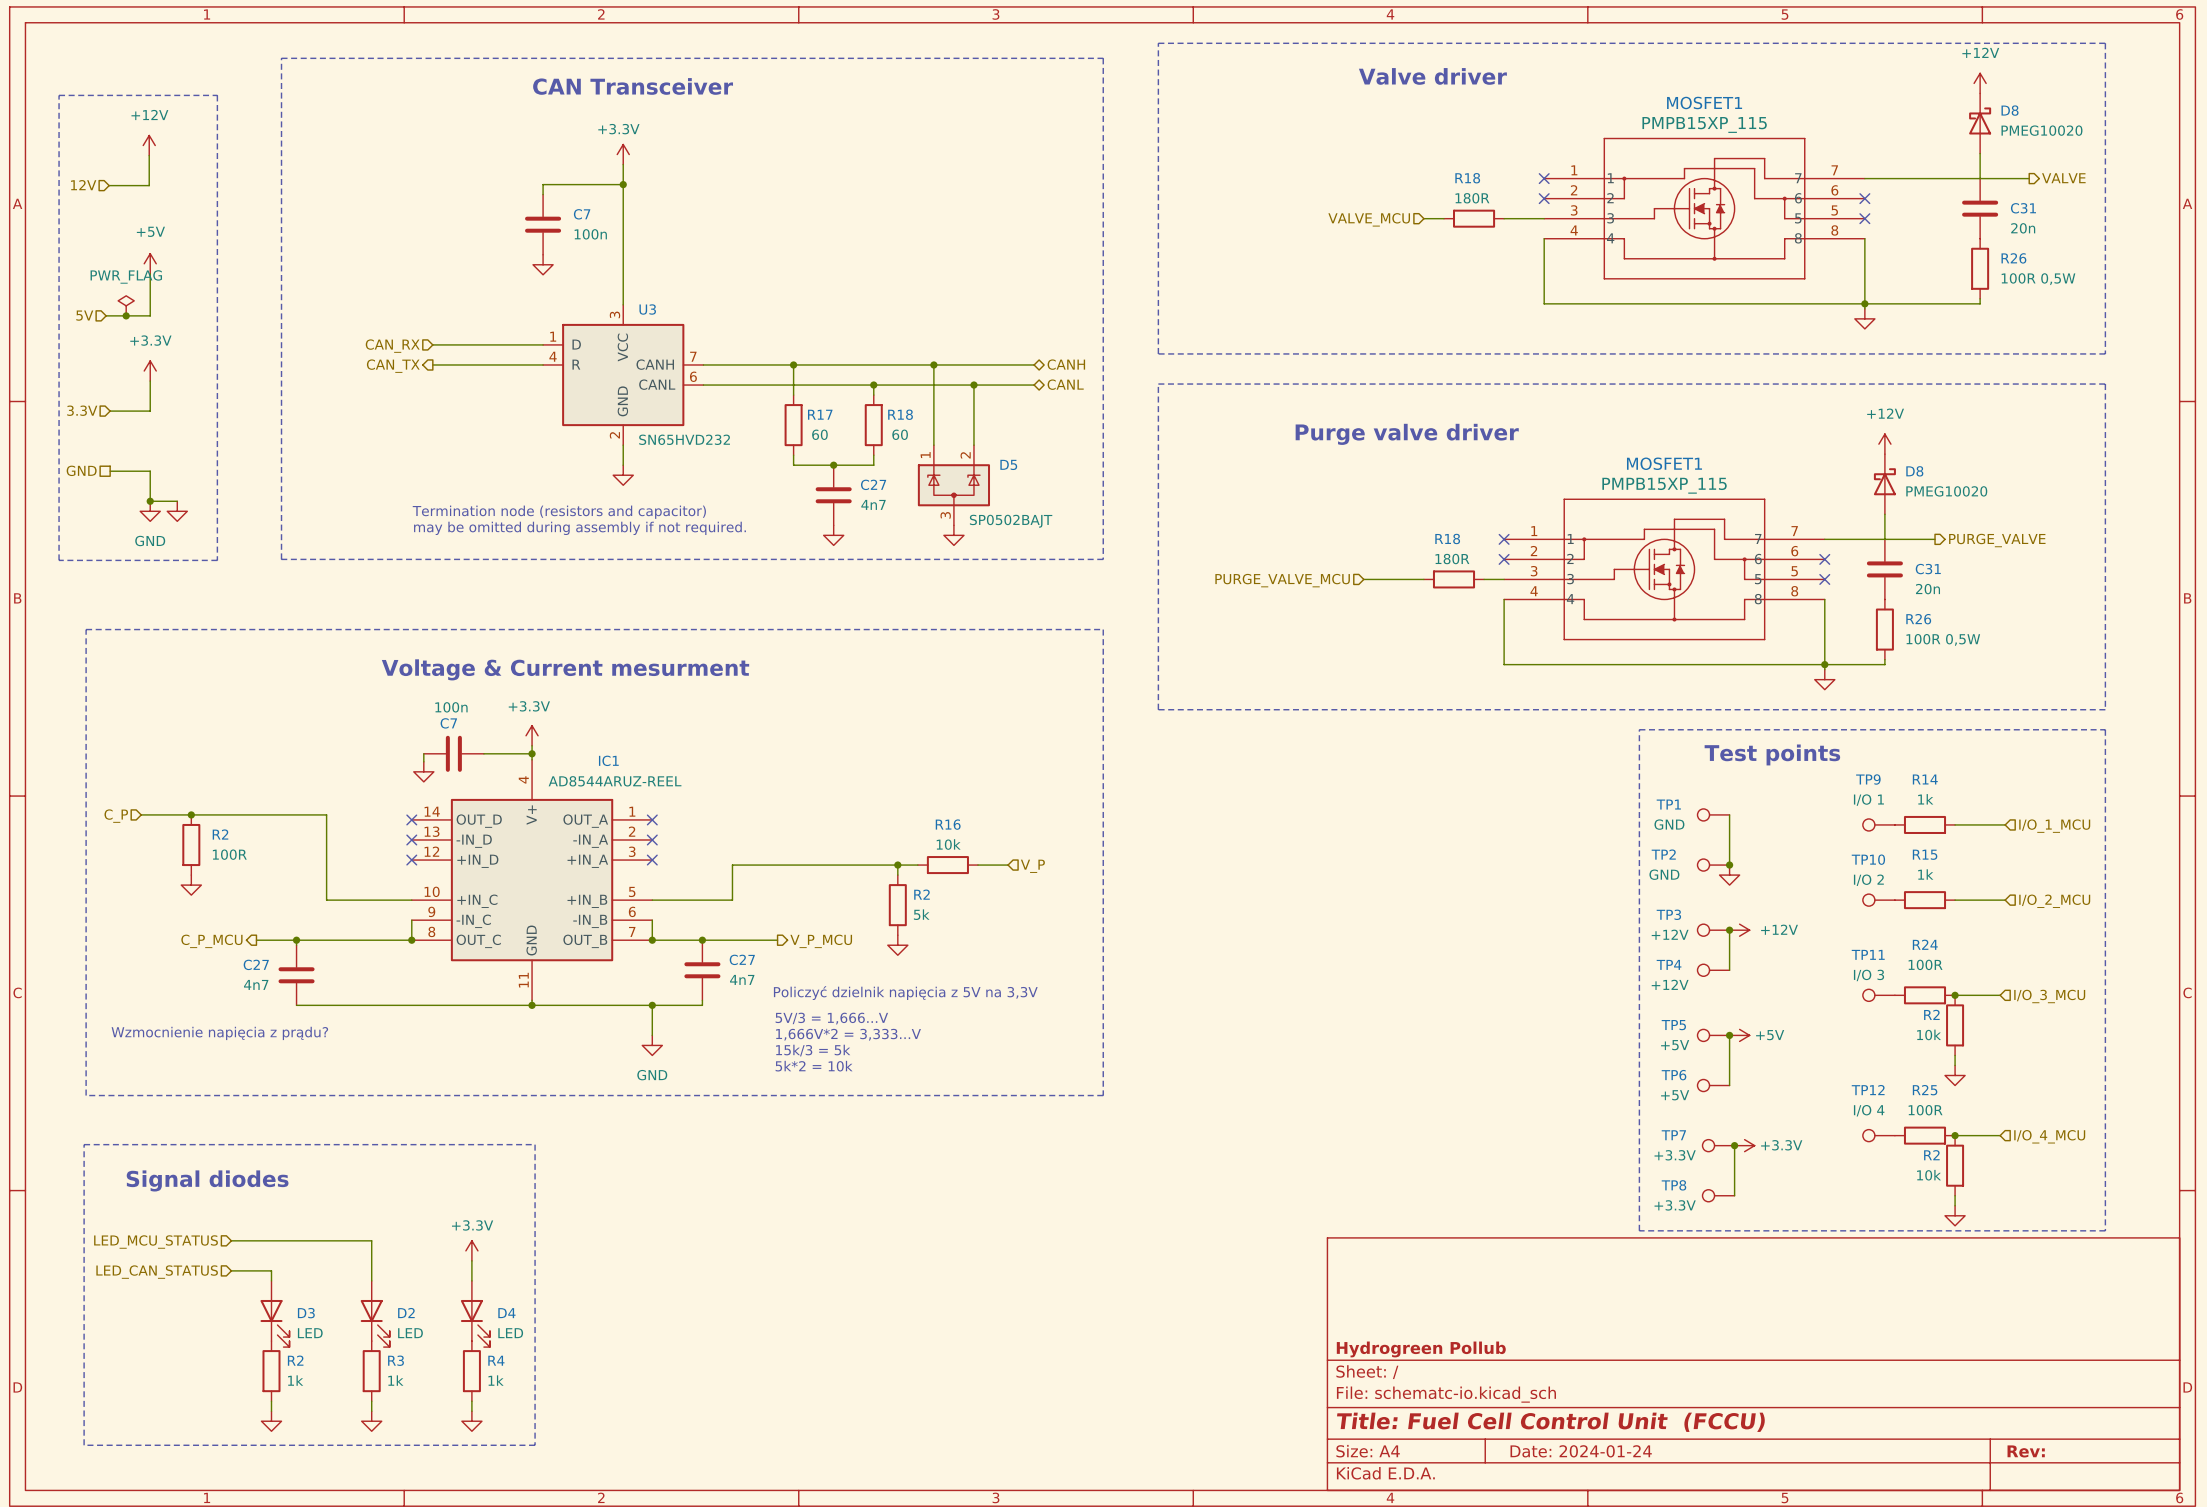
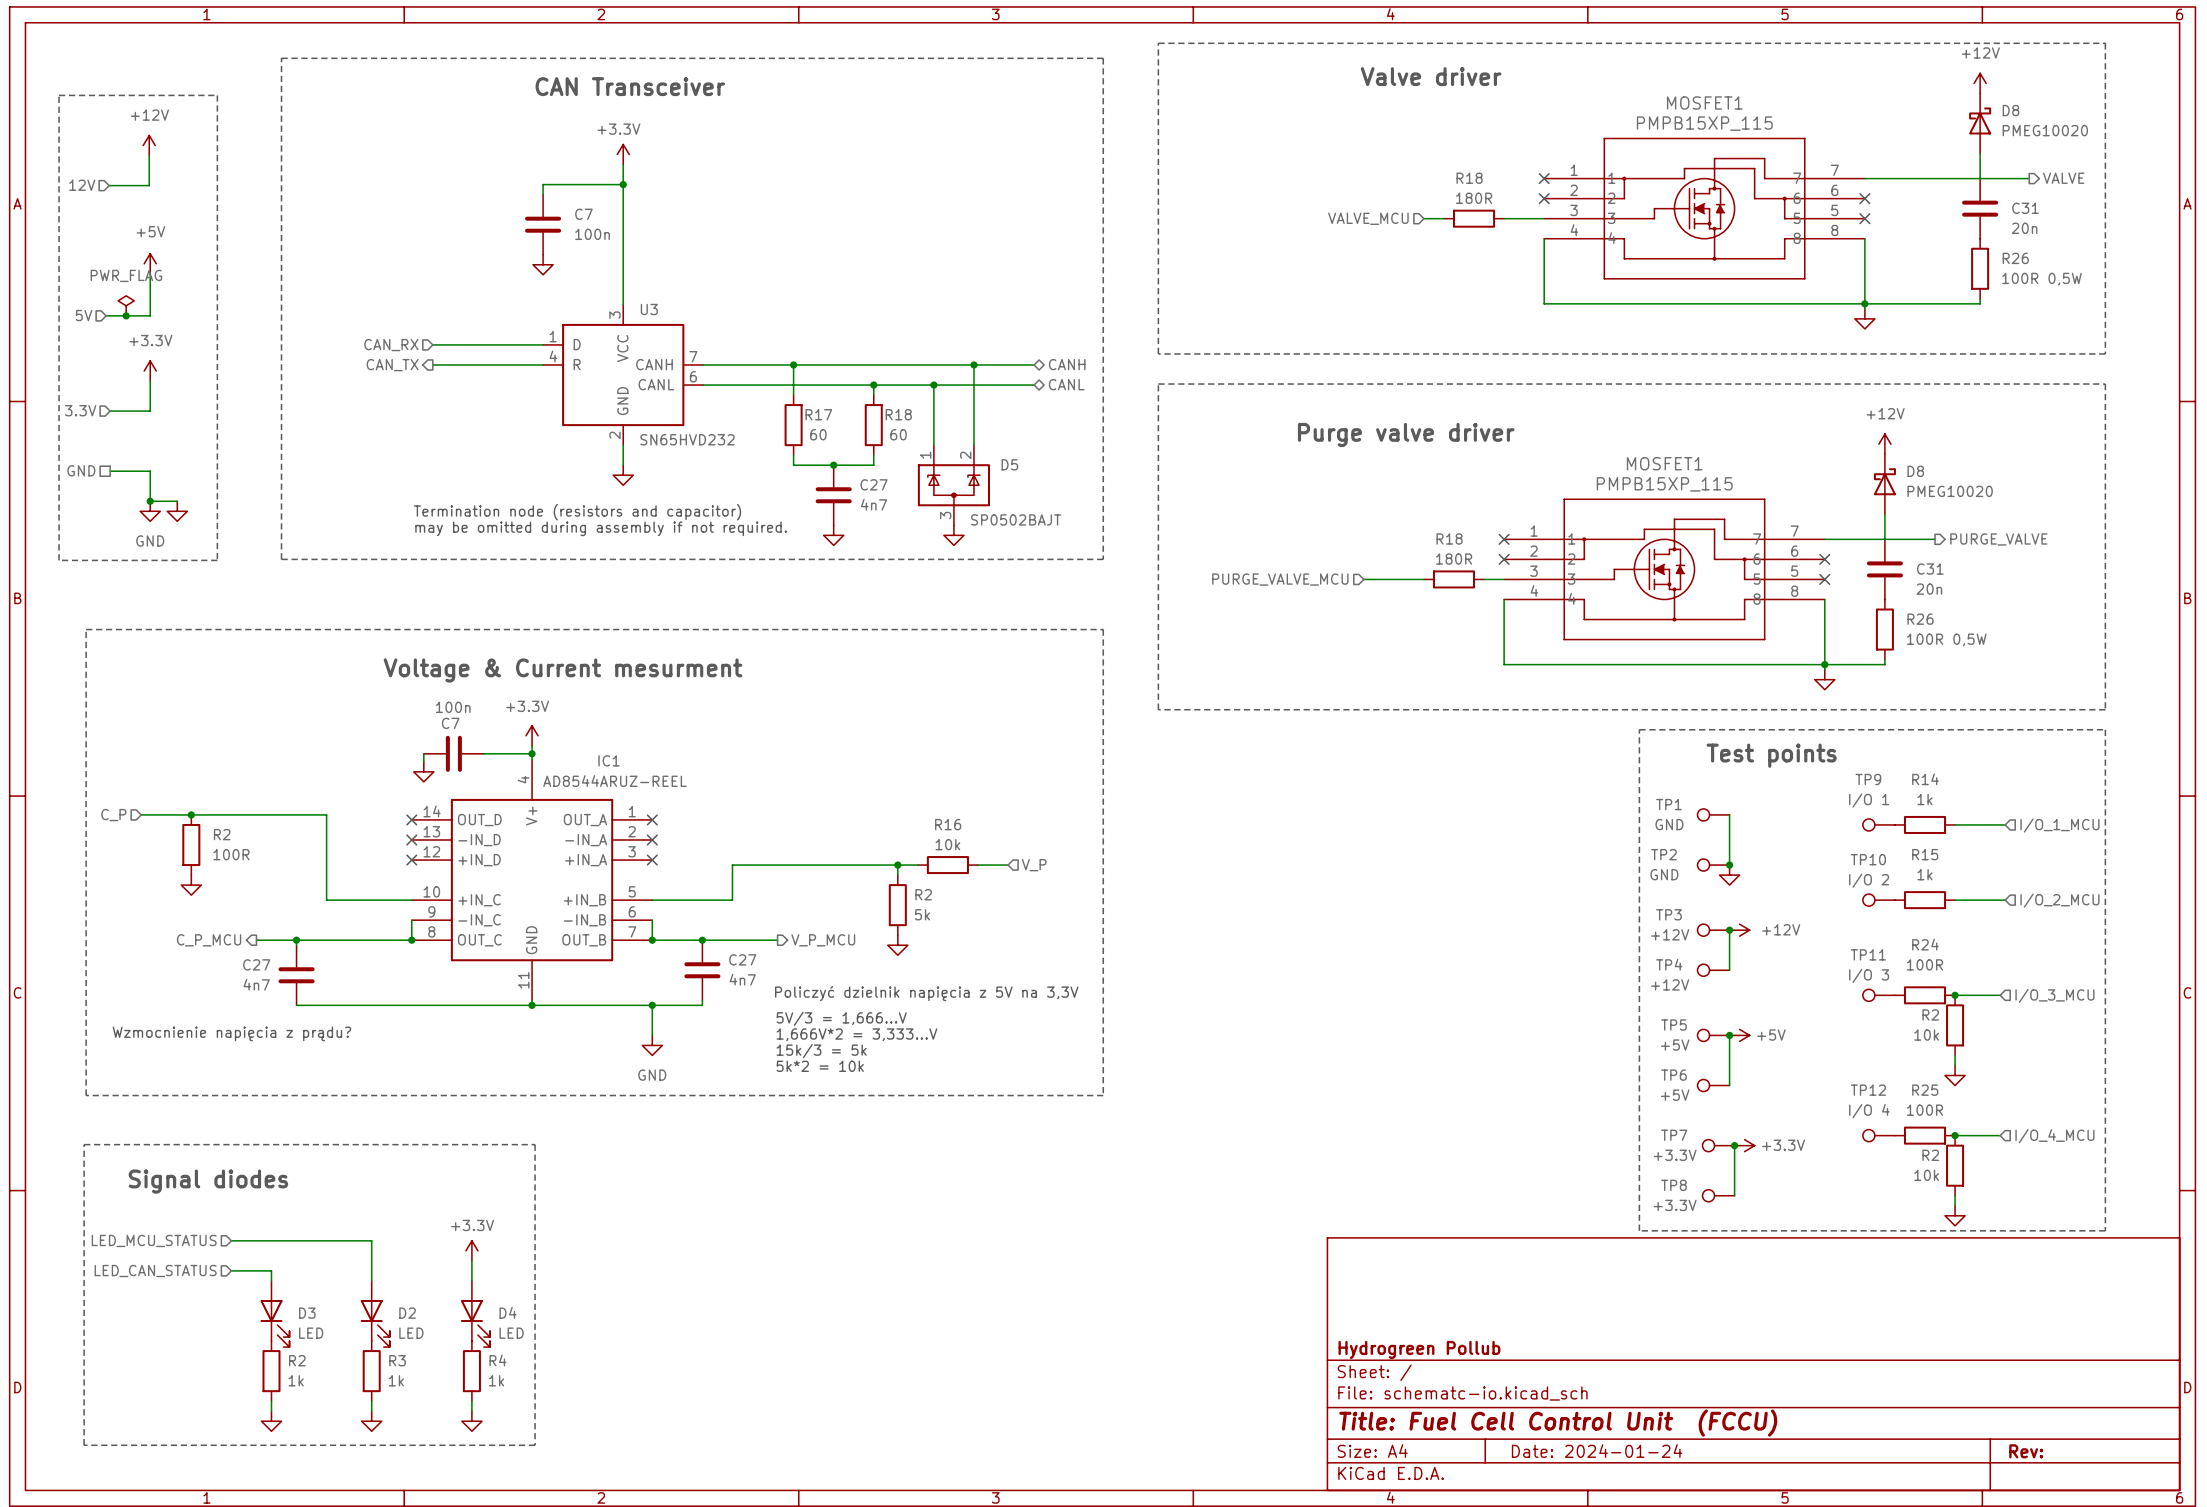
wire: (933, 364) (933, 385) -> (973, 364) (973, 385)
junction: (933, 364) -> none
junction: none -> (973, 364)
junction: none -> (933, 385)
junction: (973, 385) -> none

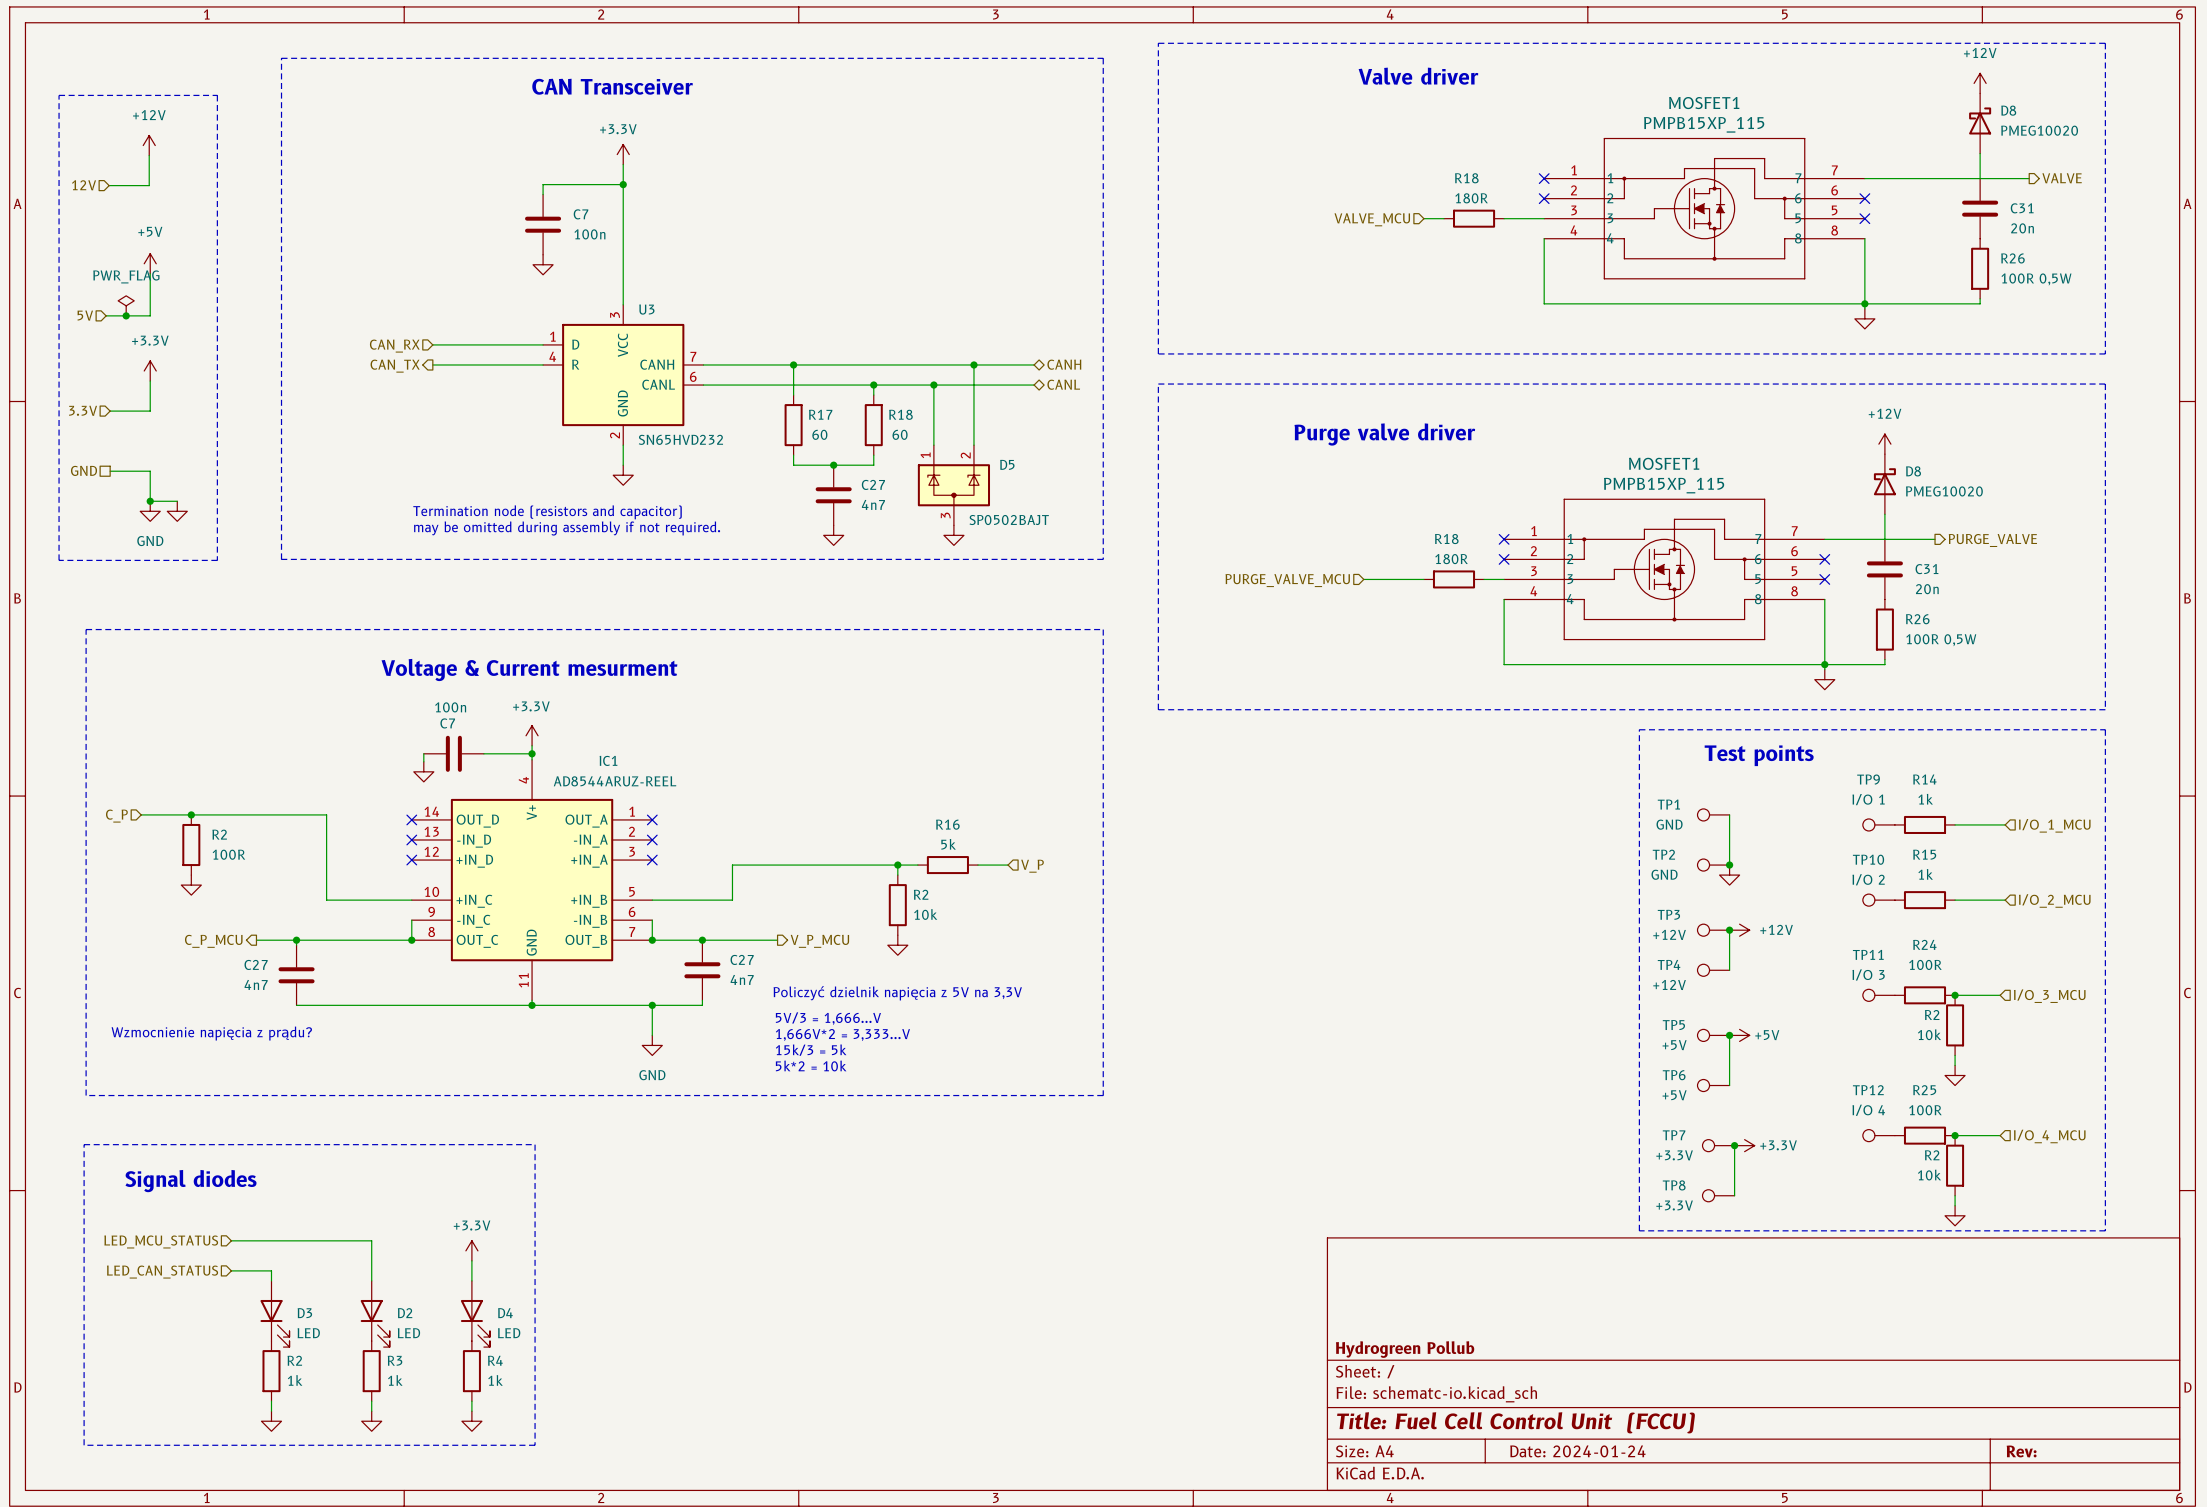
R16 value: 10k (947, 844) -> 5k (948, 844)
R2 value: 5k (922, 914) -> 10k (925, 914)

